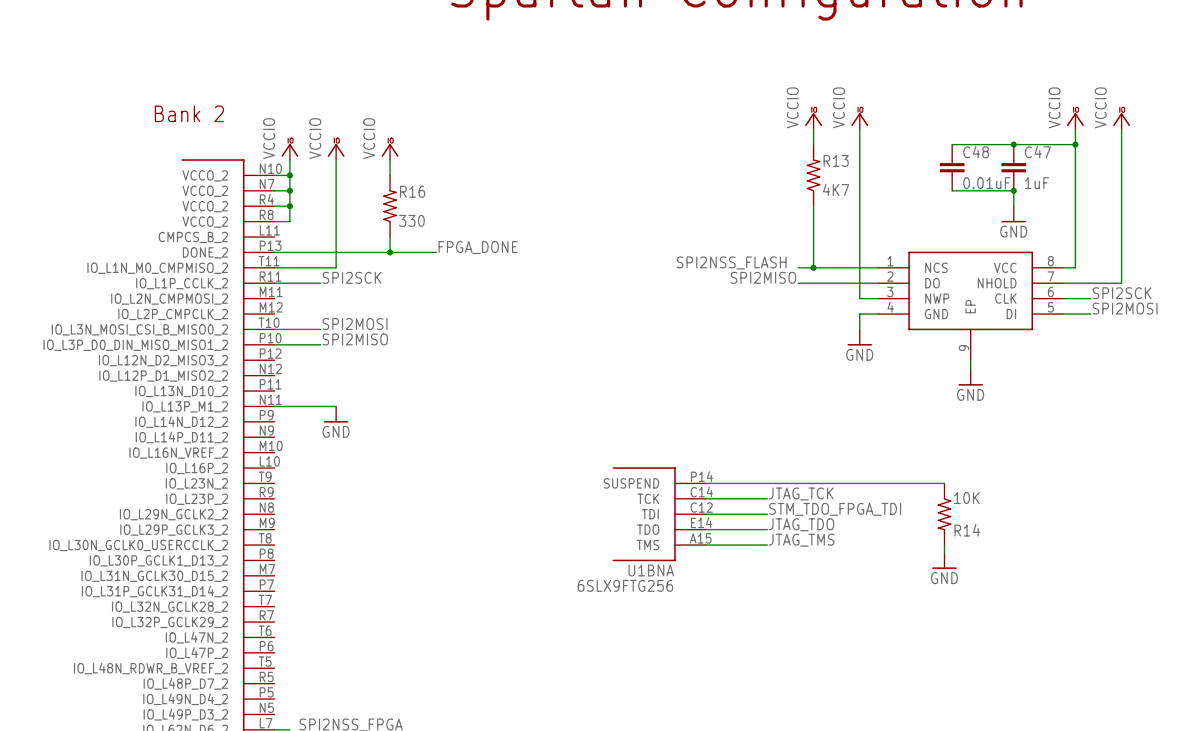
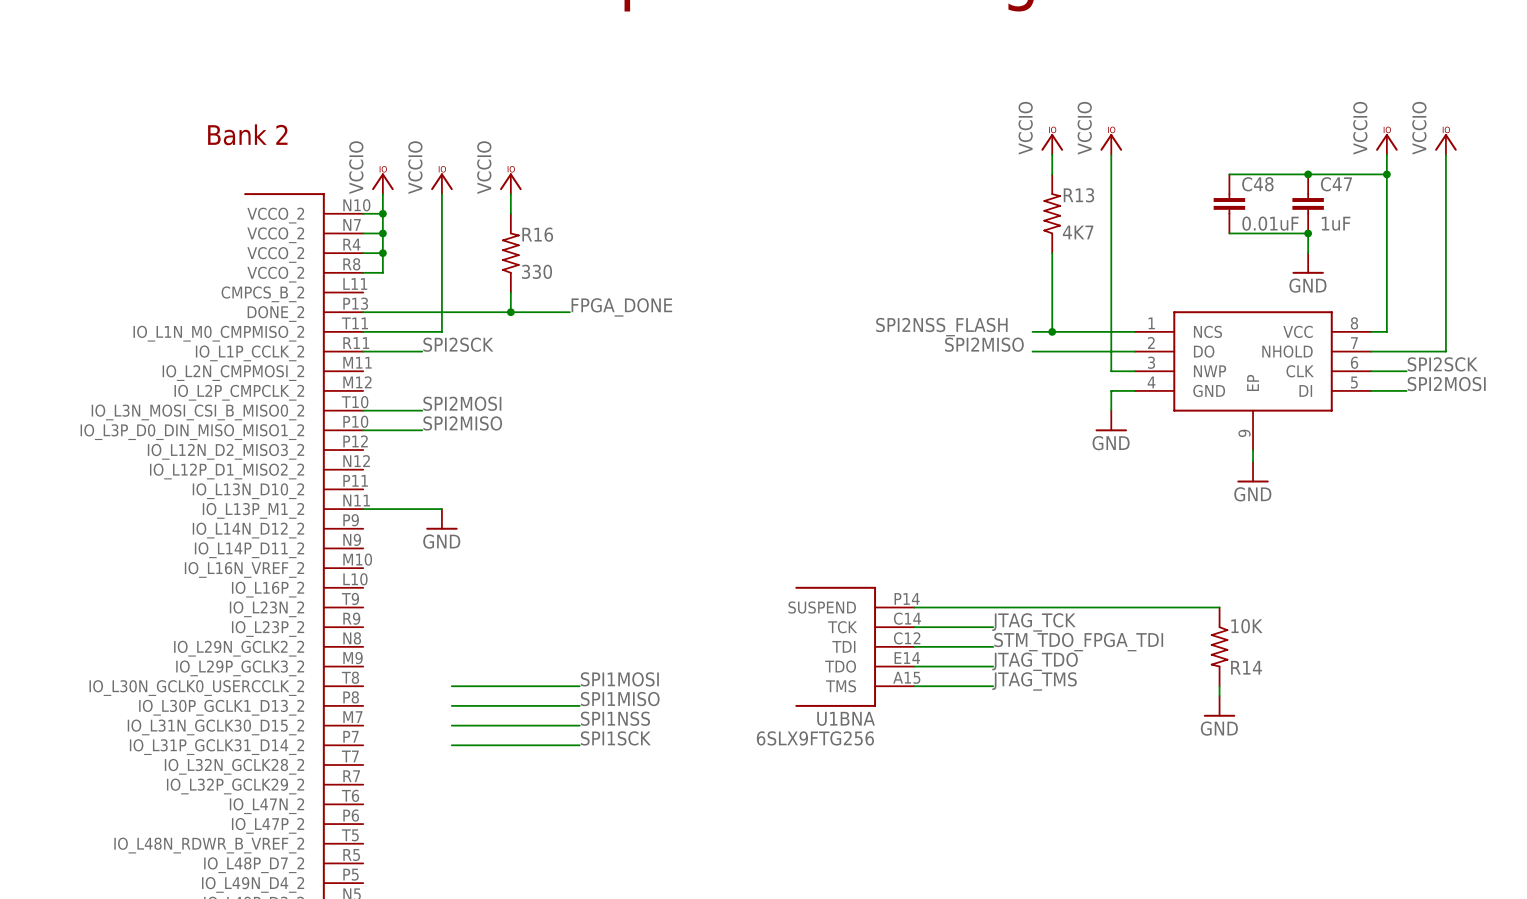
label: none -> SPI1MOSI (619, 679)
wire: none -> (451, 686) (579, 686)
label: none -> SPI1MISO (620, 699)
wire: none -> (451, 705) (579, 705)
label: none -> SPI1NSS (615, 718)
wire: none -> (451, 725) (579, 725)
label: none -> SPI1SCK (615, 738)
wire: none -> (451, 745) (579, 745)

